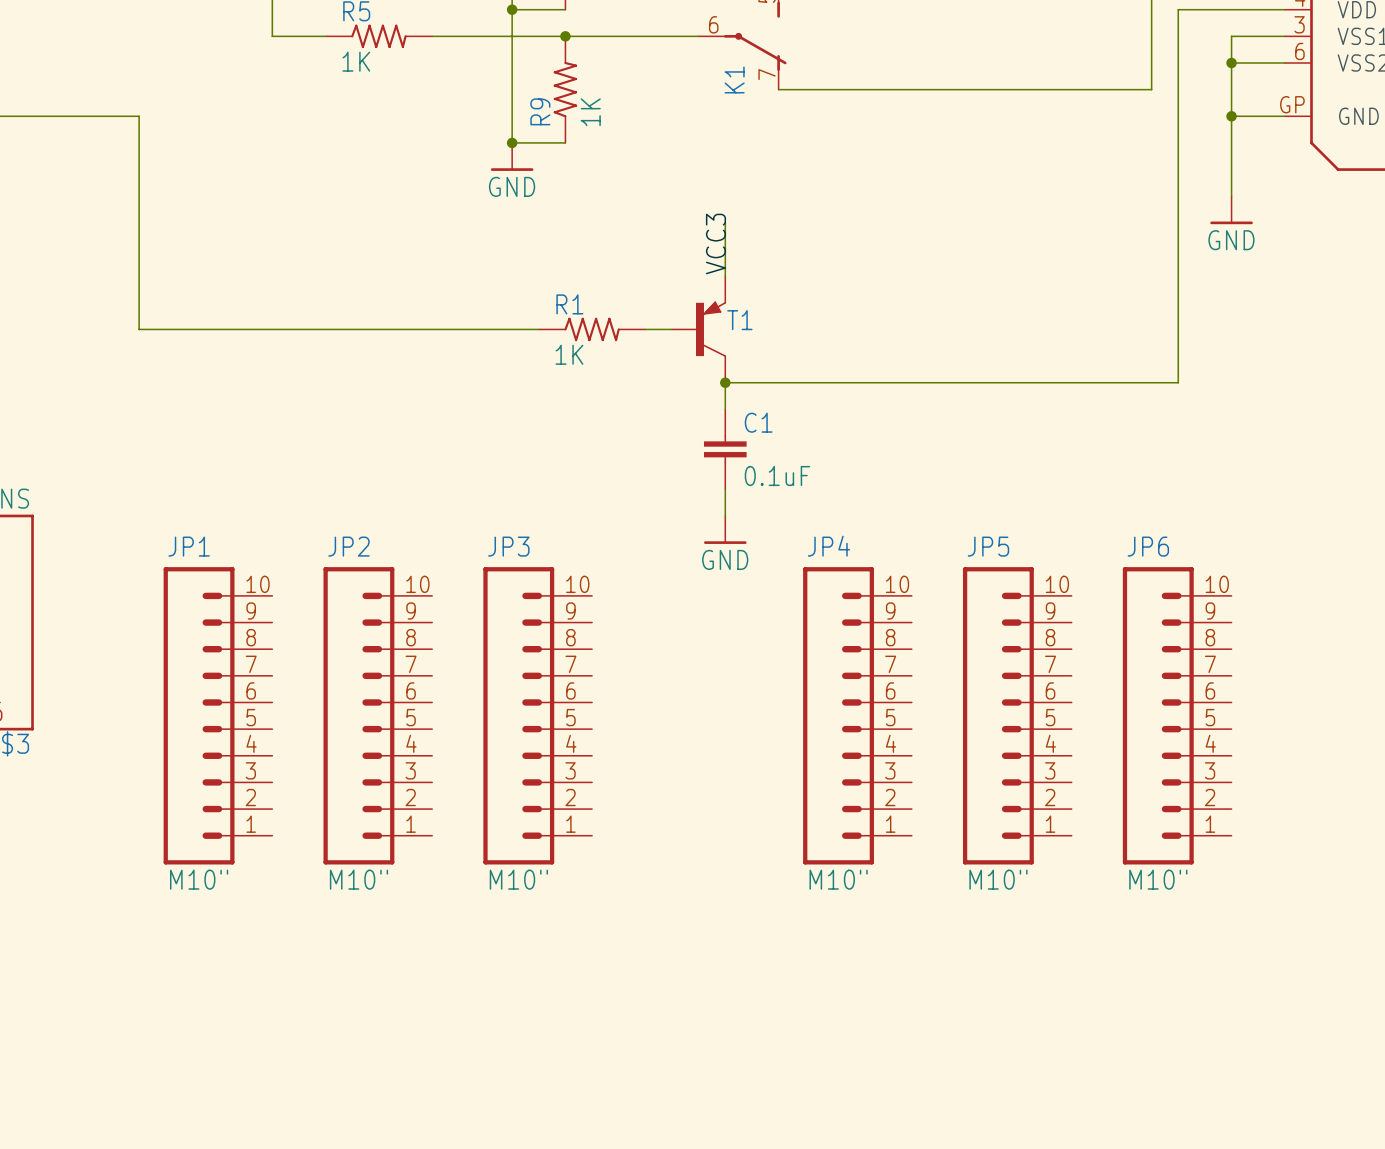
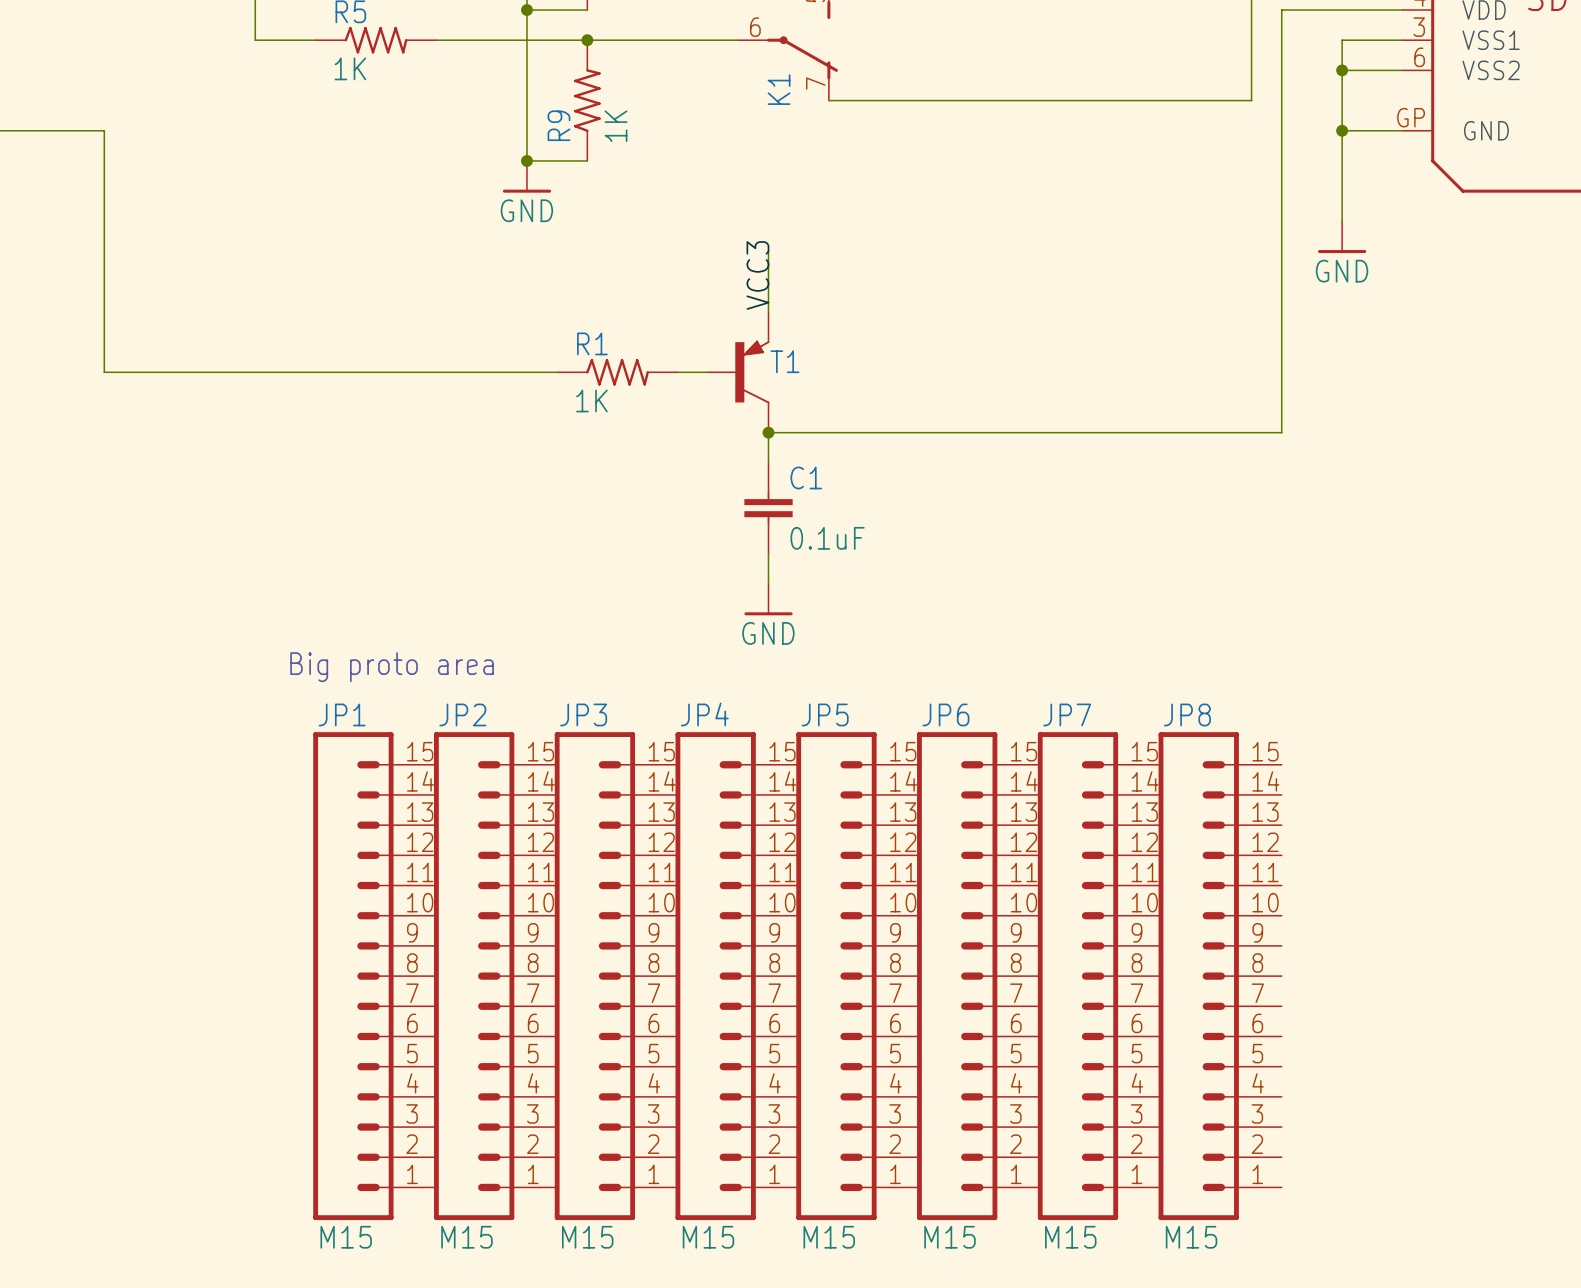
JP1 name position: JP1 (189, 546) -> JP1 (342, 714)
JP2 name position: JP2 (348, 546) -> JP2 (462, 714)
JP3 name position: JP3 (508, 546) -> JP3 (583, 714)
JP4 name position: JP4 (829, 546) -> JP4 (704, 714)
JP5 name position: JP5 (988, 546) -> JP5 (825, 714)
JP6 name position: JP6 (1148, 546) -> JP6 (945, 714)
JP1 symbol: [163, 567, 273, 865] -> [313, 732, 437, 1221]
JP2 symbol: [323, 567, 433, 865] -> [433, 732, 558, 1221]
JP3 symbol: [483, 567, 593, 865] -> [554, 732, 678, 1221]
JP4 symbol: [803, 567, 912, 865] -> [675, 732, 799, 1221]
JP5 symbol: [962, 567, 1072, 865] -> [796, 732, 920, 1221]
JP6 symbol: [1122, 567, 1232, 865] -> [917, 732, 1041, 1221]
text: none -> Big proto area (392, 667)
JP7: none -> M15 (1099, 976)
JP8: none -> M15 (1220, 976)
JP1 value: M10" (199, 879) -> M15 (346, 1237)
JP2 value: M10" (358, 879) -> M15 (466, 1237)
JP3 value: M10" (518, 879) -> M15 (587, 1237)
JP4 value: M10" (838, 879) -> M15 (708, 1237)
JP5 value: M10" (998, 879) -> M15 (829, 1237)
JP6 value: M10" (1158, 879) -> M15 (950, 1237)

